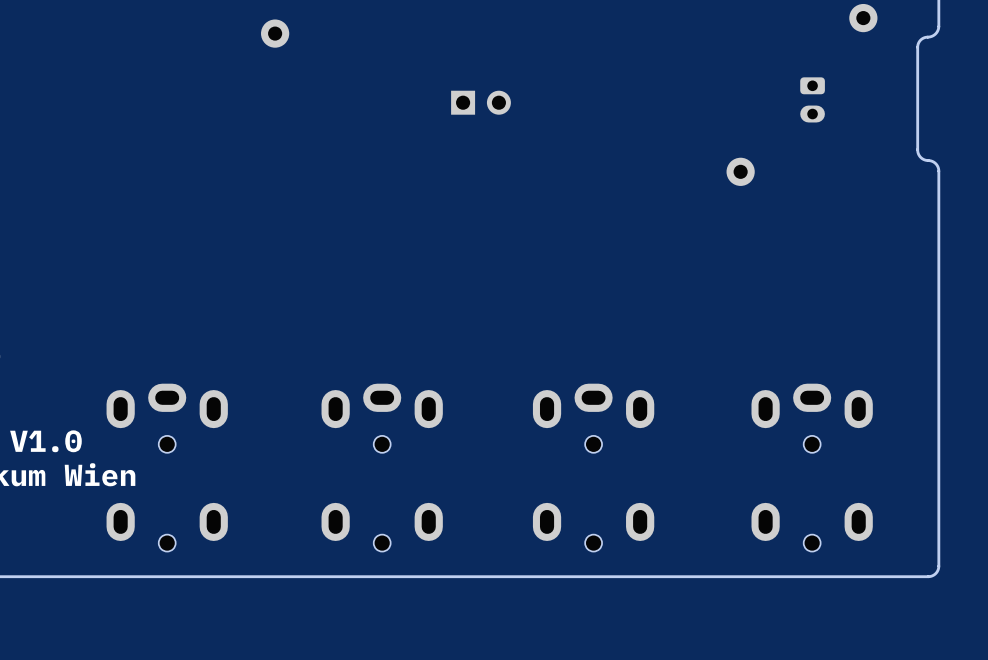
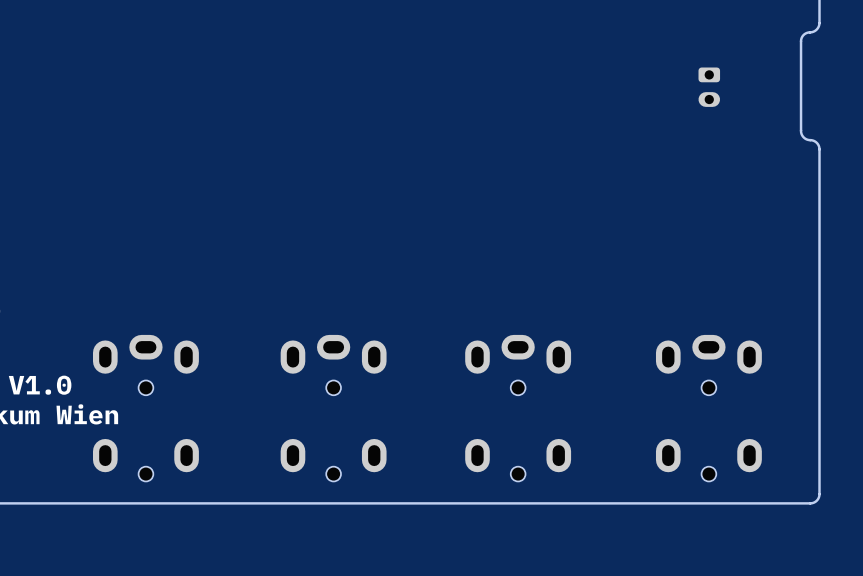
part: (863, 18) -> none
part: (275, 33) -> none
part: (481, 102) -> none
part: (740, 171) -> none

